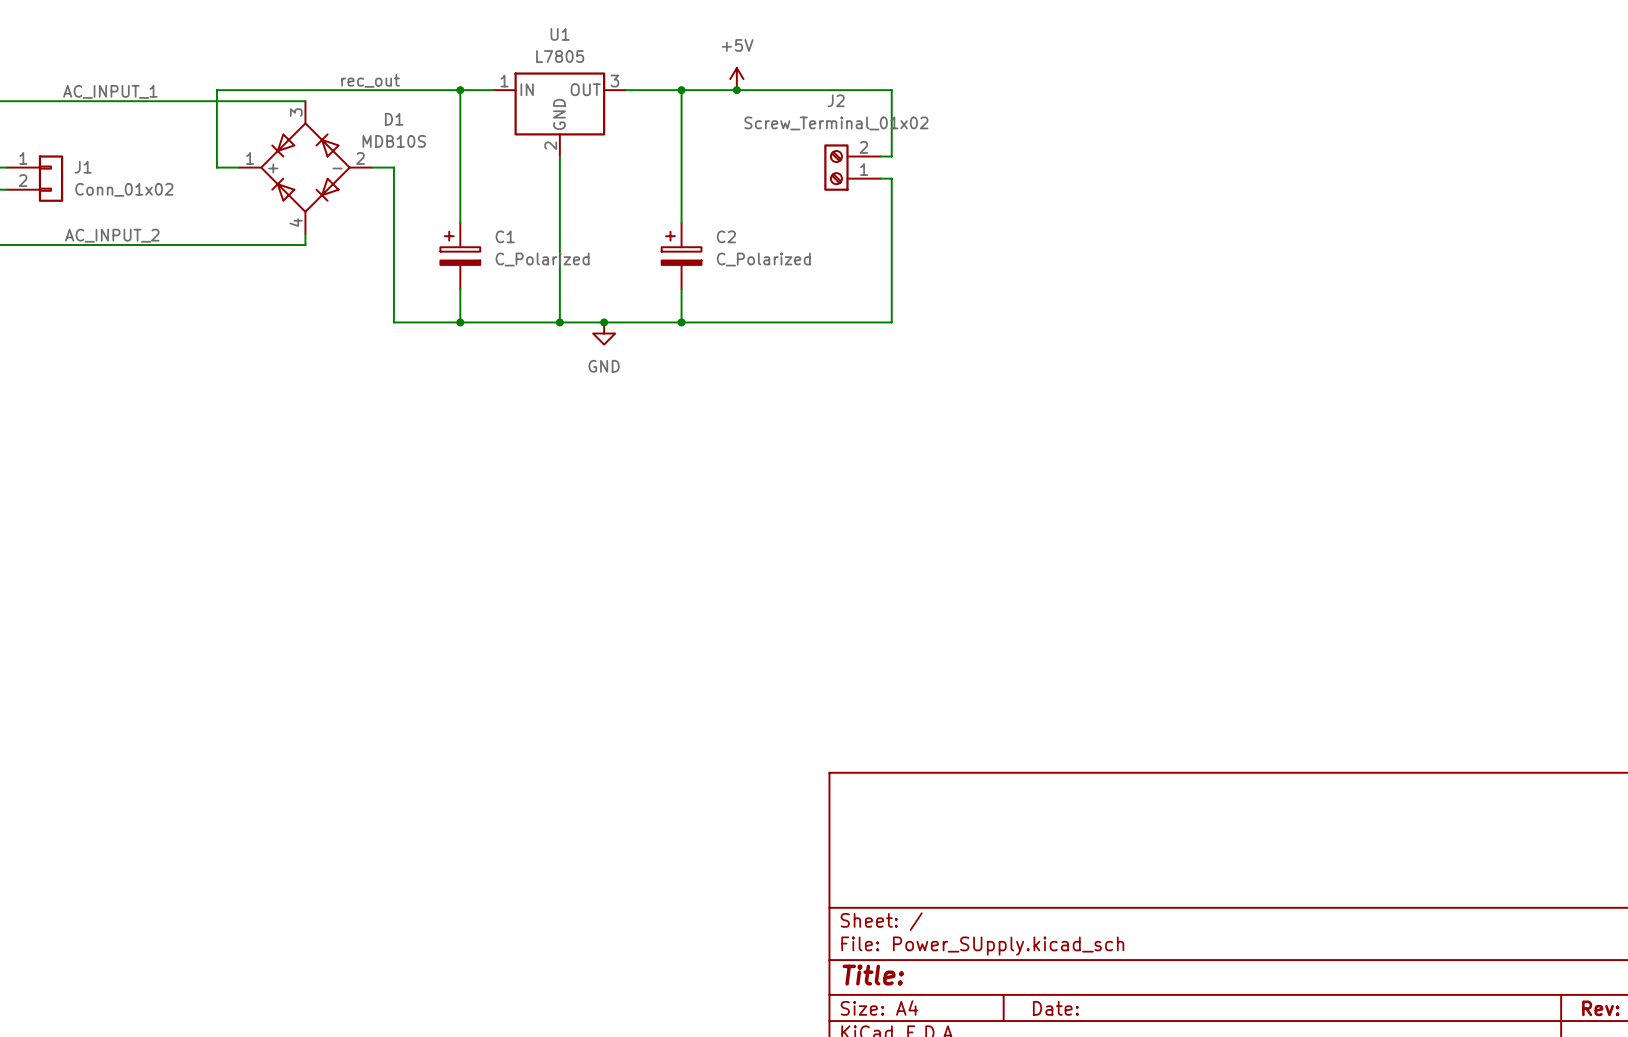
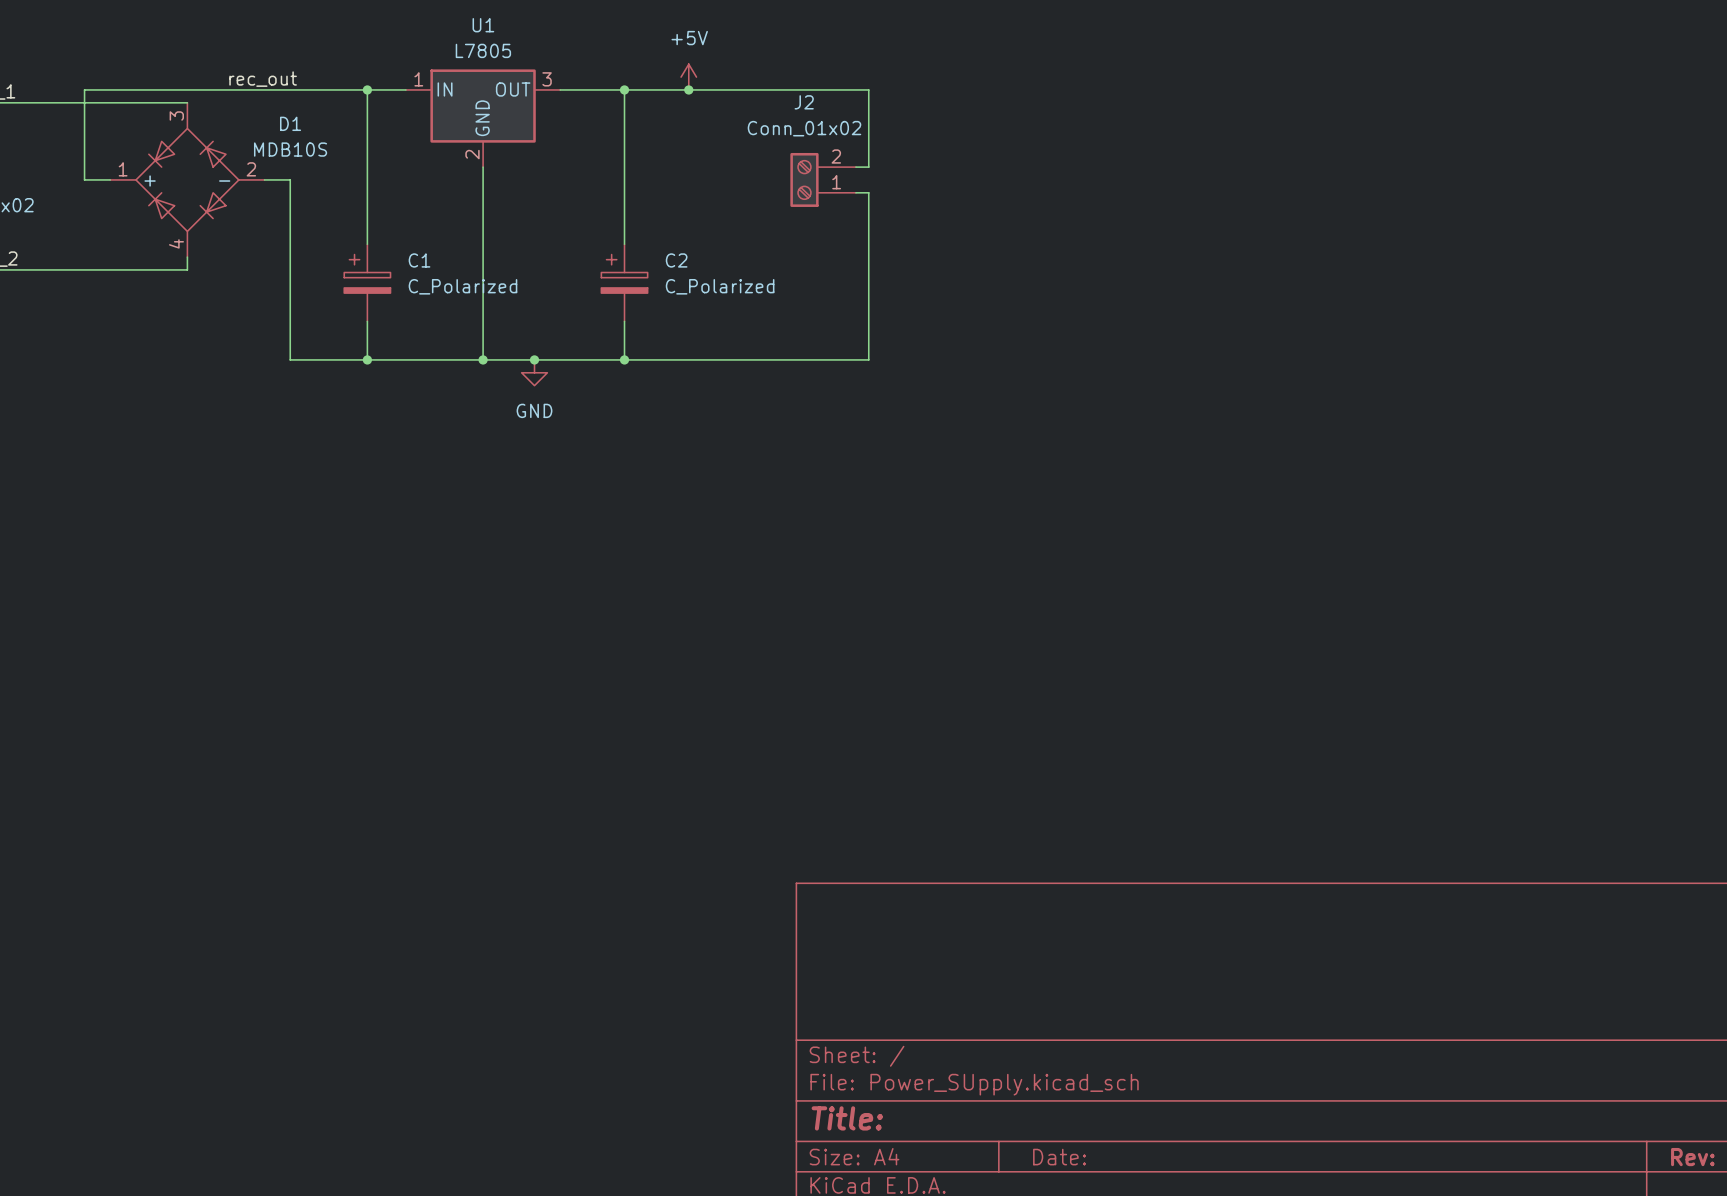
J2 value: Screw_Terminal_01x02 (836, 123) -> Conn_01x02 (804, 128)

